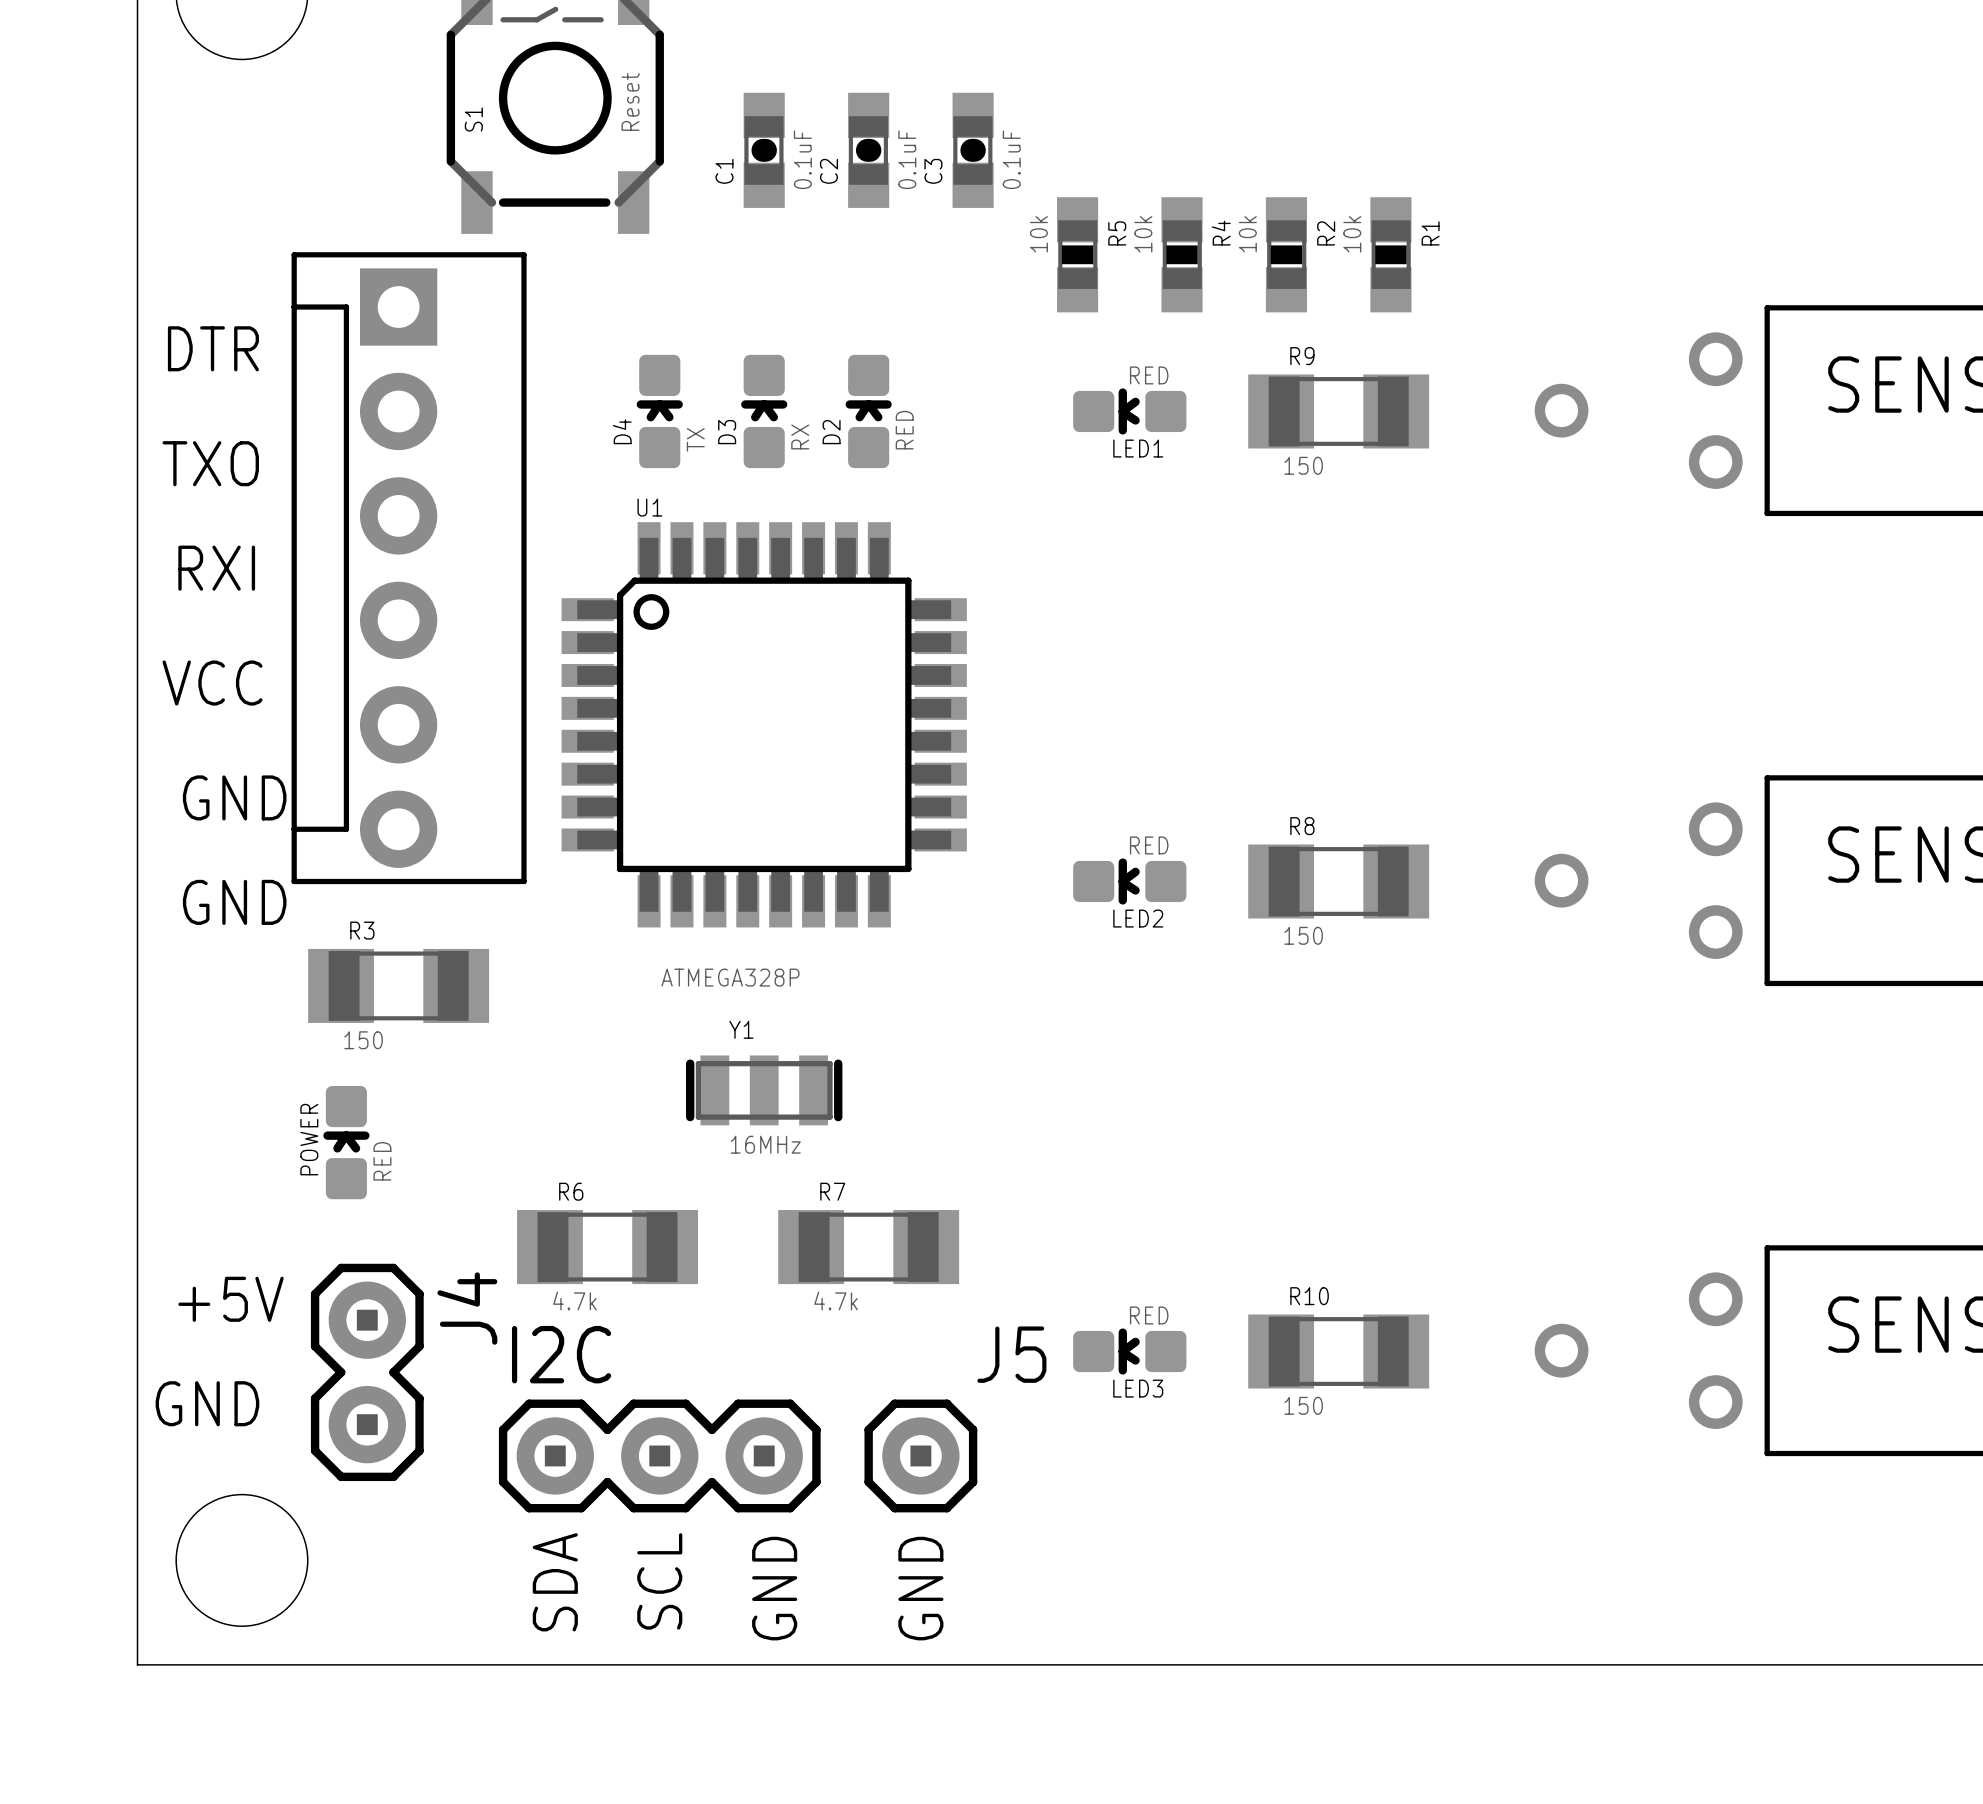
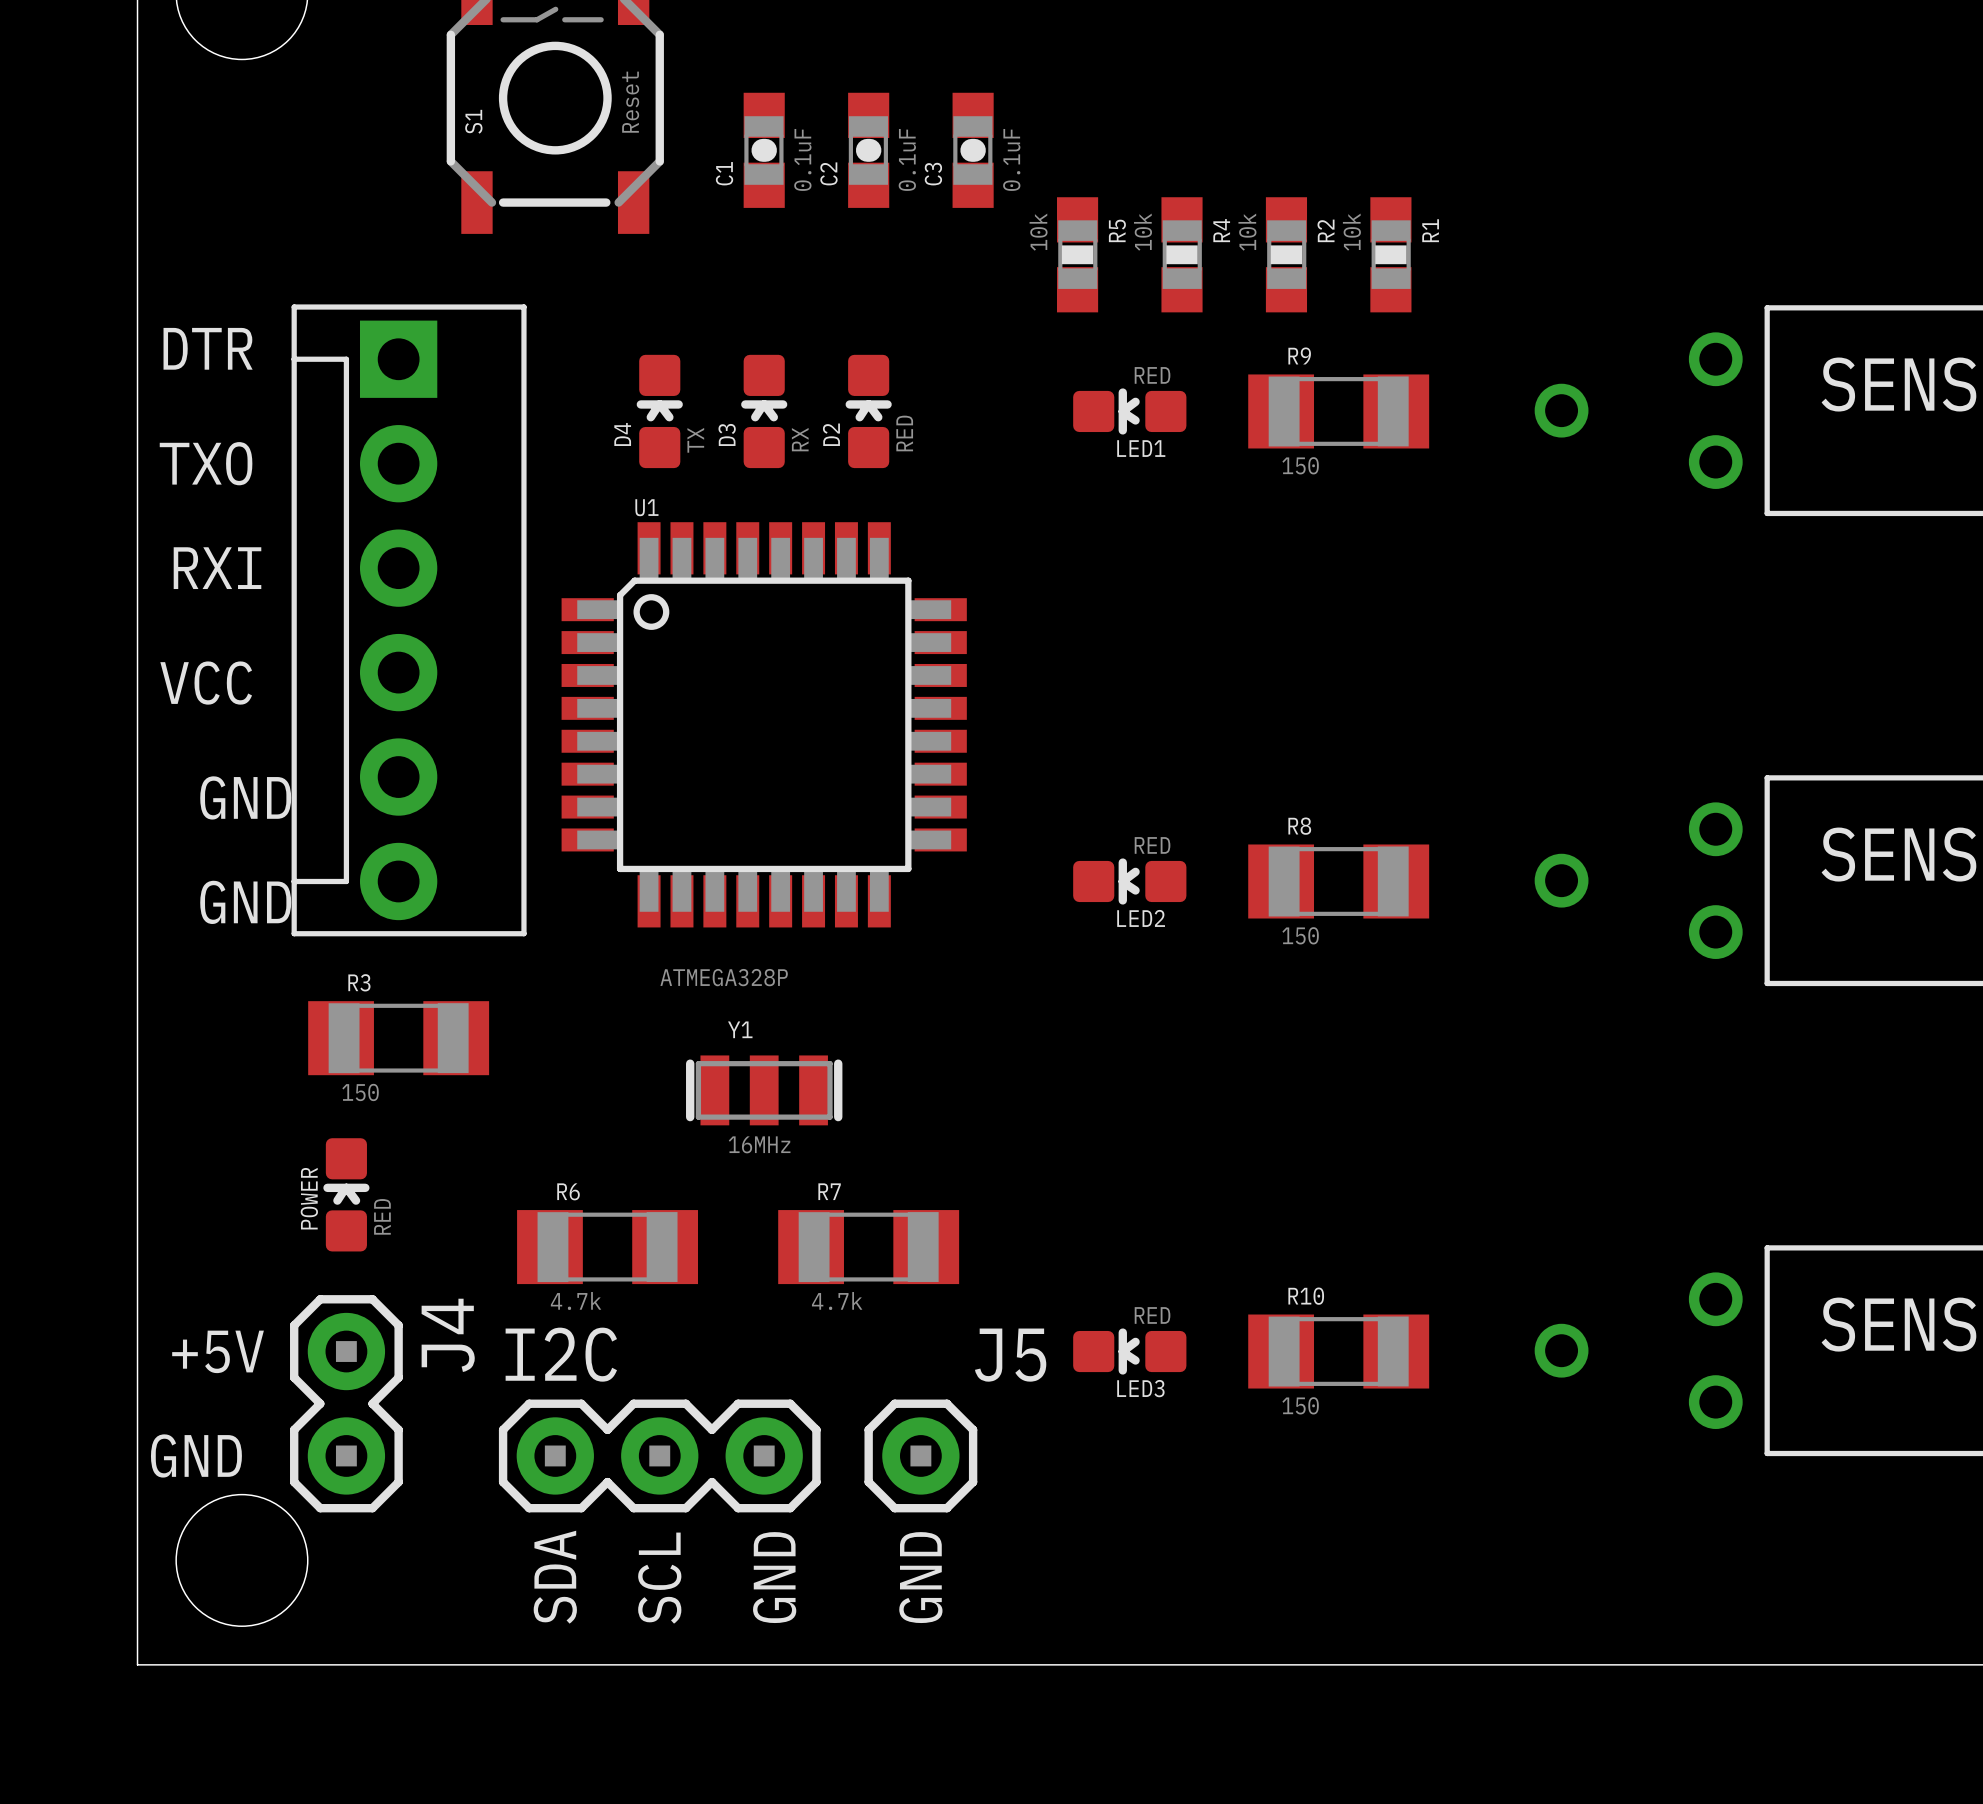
part position: (409, 568) -> (409, 620)
R3 position: (398, 985) -> (398, 1038)
POWER position: (346, 1142) -> (346, 1194)
text position: +5V (231, 1299) -> +5V (218, 1351)
J4 position: (367, 1372) -> (346, 1403)
text position: GND (207, 1403) -> GND (196, 1455)

